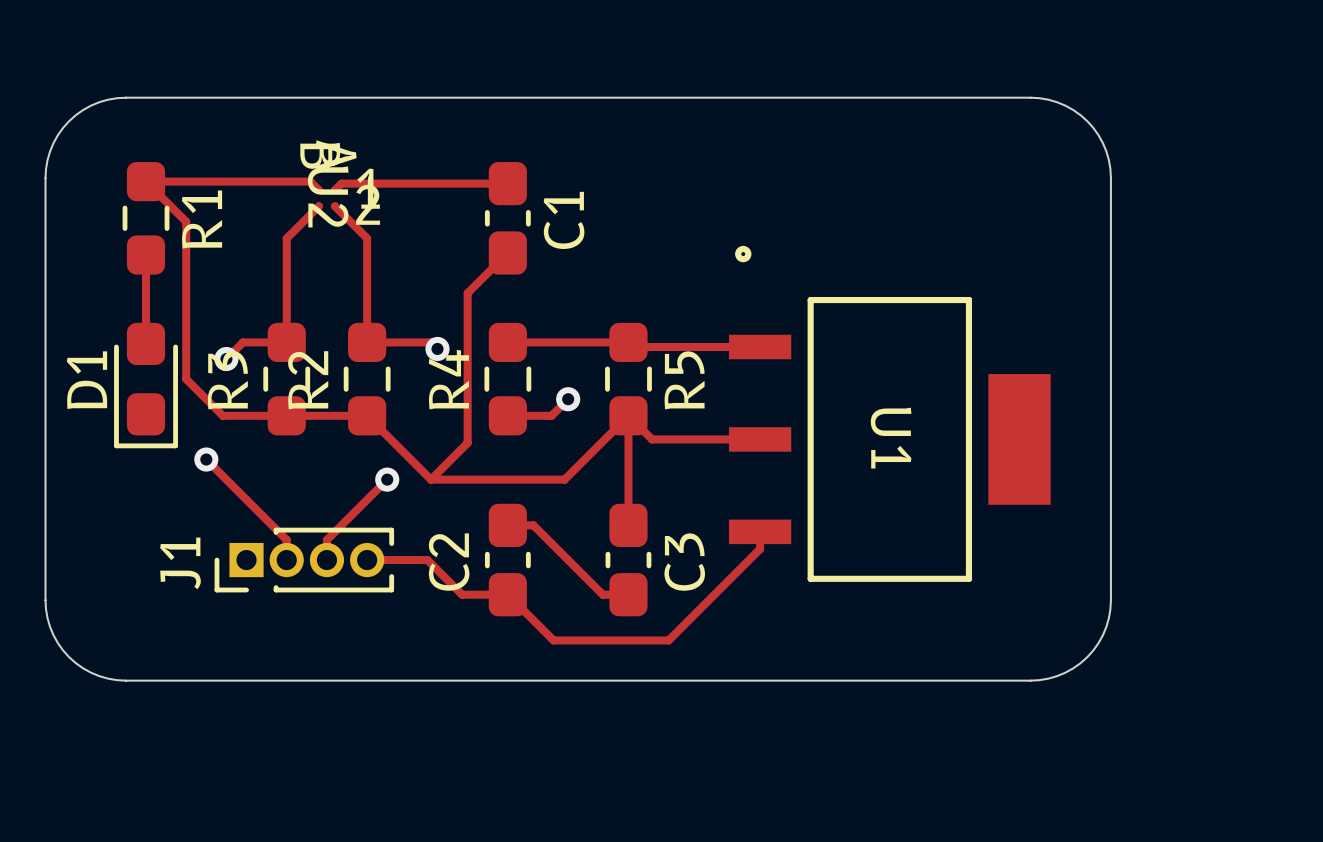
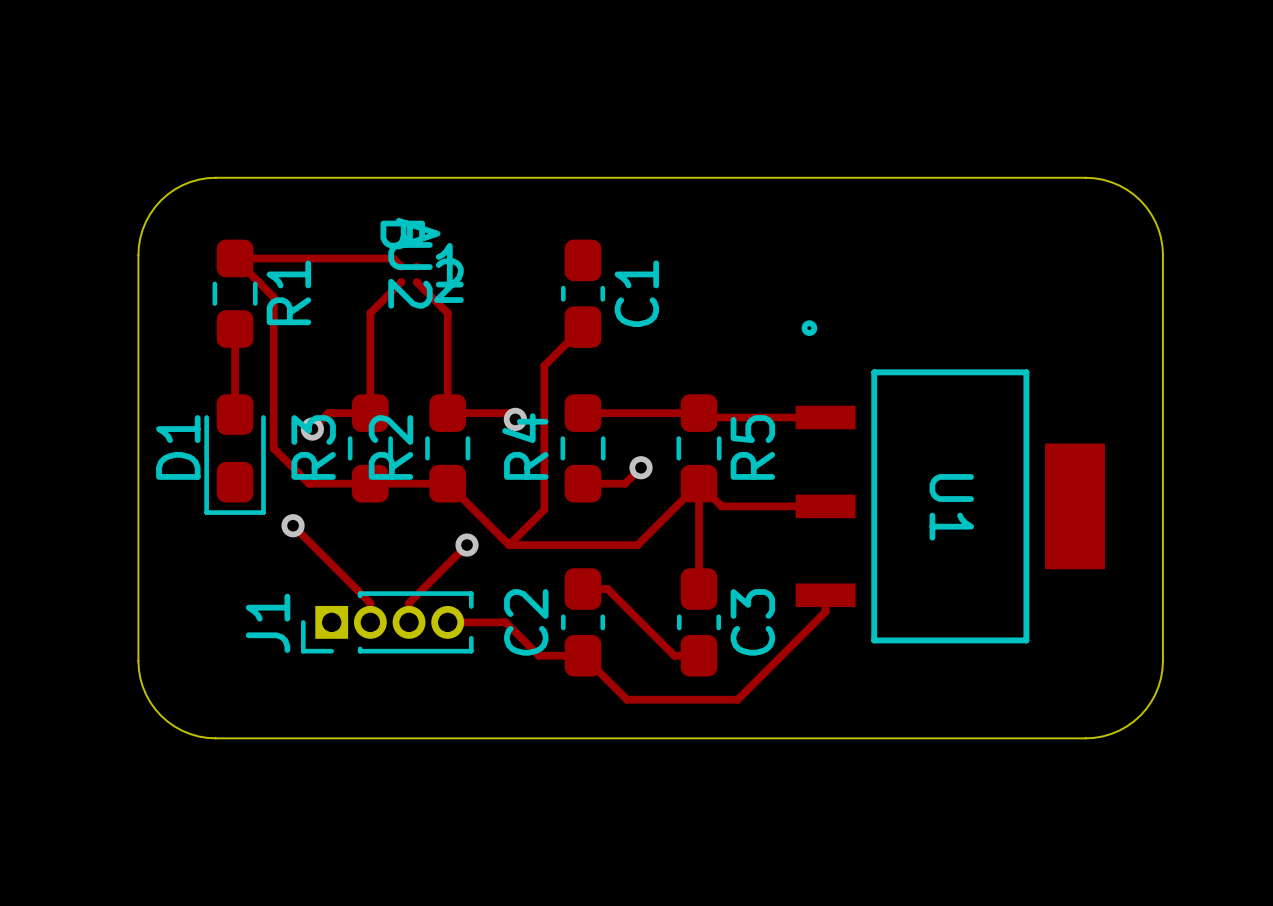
track: (507, 183) (341, 183) (335, 190) -> none

